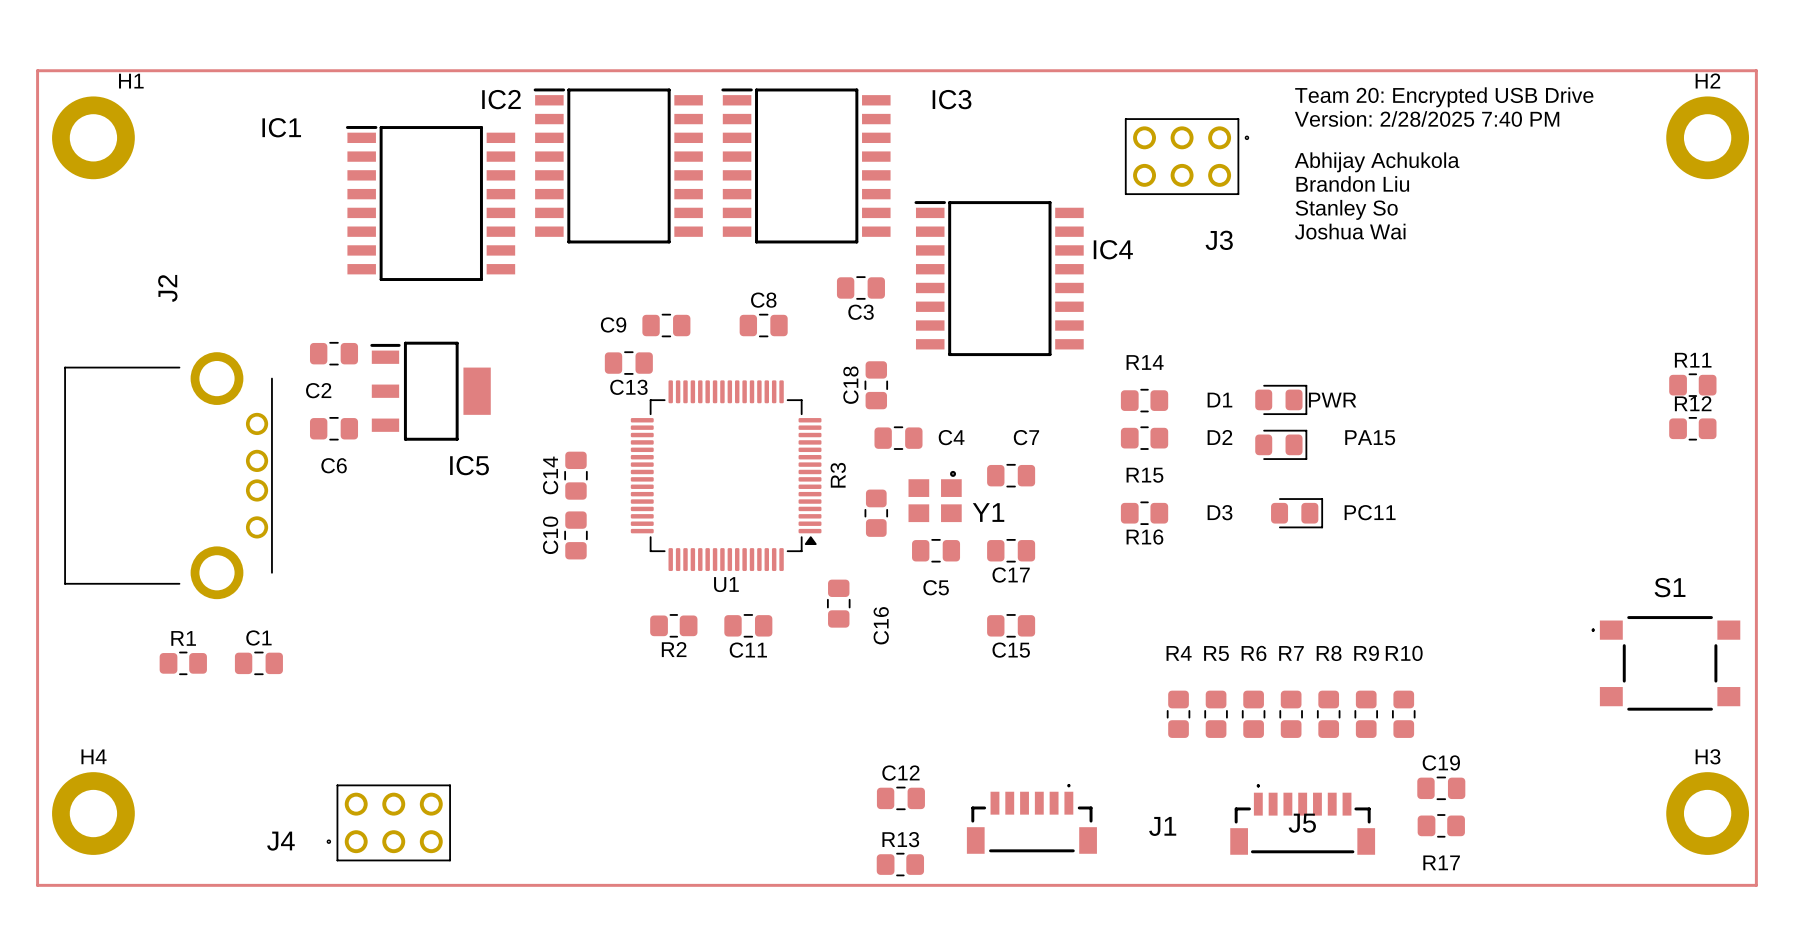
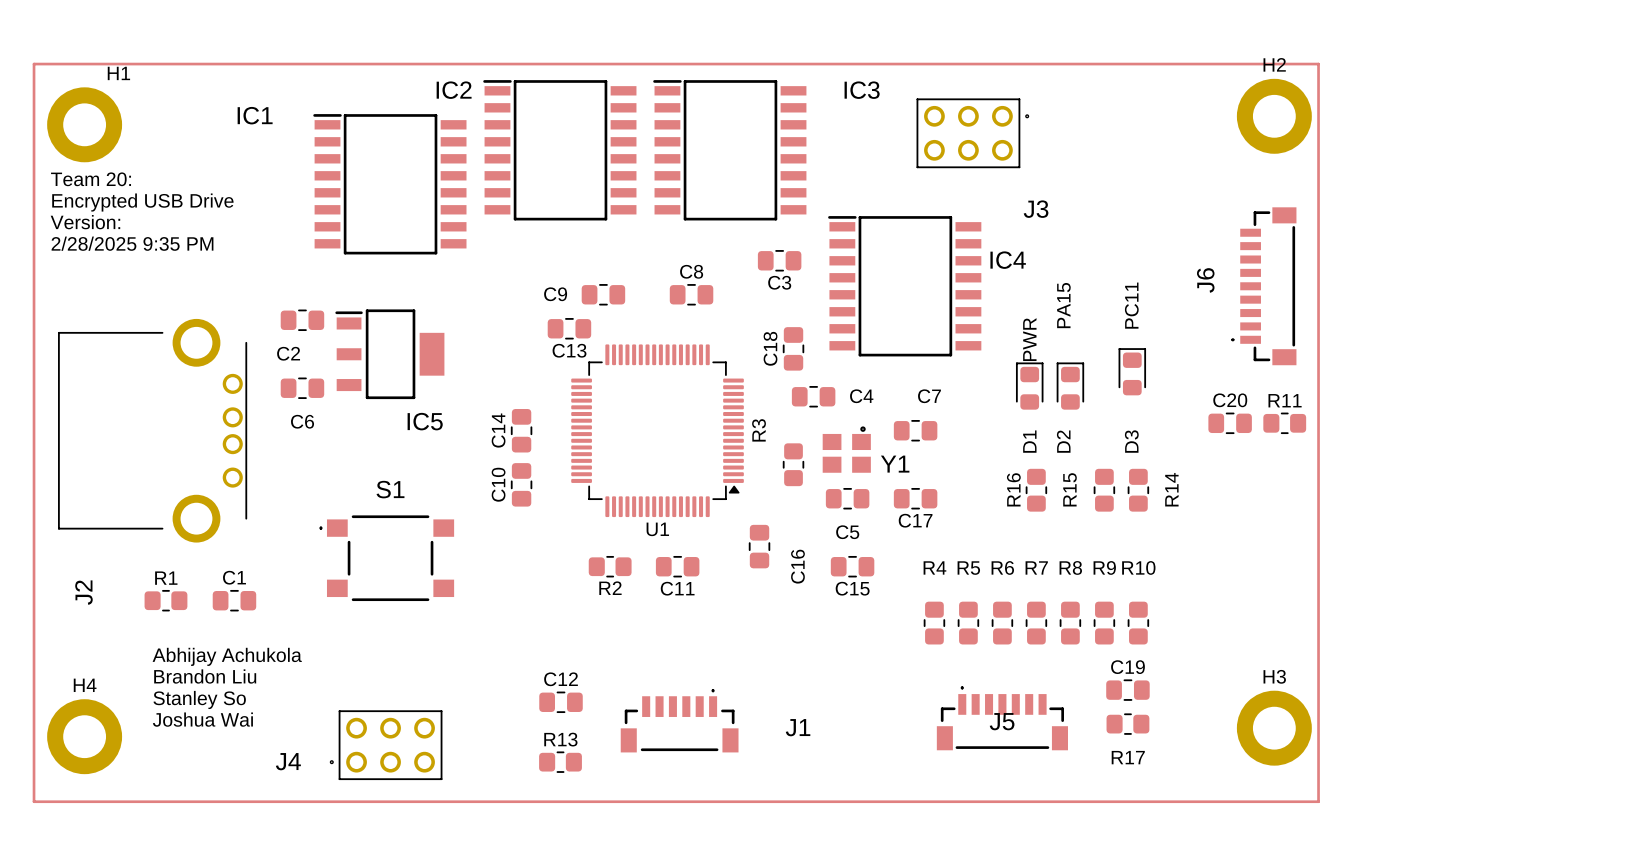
track: (1456, 70) (1756, 70) (1756, 885) (1456, 885) -> (1318, 64) (1318, 801)
text: Team 20: Encrypted USB Drive (1444, 97) -> none
text: Version: 2/28/2025 7:40 PM (1427, 118) -> none
H2 position: (1707, 137) -> (1274, 116)
J3 position: (1187, 156) -> (972, 133)
text: Abhijay Achukola (1377, 162) -> none
text: Brandon Liu (1352, 183) -> none
text: none -> Team 20: (91, 179)
text: Stanley So (1346, 209) -> none
text: none -> Encrypted USB Drive (142, 202)
text: Joshua Wai (1350, 231) -> none
J3 name position: J3 (1219, 240) -> J3 (1036, 209)
text: none -> Version: (85, 222)
text: none -> 2/28/2025 9:35 PM (132, 243)
IC4 position: (999, 278) -> (904, 286)
J2 name position: J2 (167, 288) -> J2 (83, 592)
J6: none -> (1263, 286)
R11 position: (1692, 385) -> (1284, 423)
D1 rotation: 0° (1281, 399) -> 90° counterclockwise (1029, 386)
D1 position: (1281, 399) -> (1029, 386)
R14 rotation: 0° (1144, 400) -> 90° clockwise (1138, 490)
R14 position: (1144, 400) -> (1138, 490)
text rotation: 0° (1332, 400) -> 90° counterclockwise (1029, 339)
text position: PWR (1332, 400) -> PWR (1029, 339)
R12: (1692, 428) -> none
text rotation: 0° (1370, 437) -> 90° counterclockwise (1063, 305)
text position: PA15 (1370, 437) -> PA15 (1063, 305)
R15 rotation: 0° (1144, 438) -> 90° clockwise (1104, 490)
R15 position: (1144, 438) -> (1104, 490)
D2 rotation: 0° (1281, 444) -> 90° counterclockwise (1070, 386)
D2 position: (1281, 444) -> (1070, 386)
C20: none -> (1230, 423)
text rotation: 0° (1370, 512) -> 90° counterclockwise (1131, 305)
text position: PC11 (1370, 512) -> PC11 (1131, 305)
R16 rotation: 0° (1144, 513) -> 90° clockwise (1036, 490)
D3 rotation: 0° (1297, 513) -> 90° counterclockwise (1132, 371)
D3 position: (1297, 513) -> (1132, 371)
C15 position: (1011, 625) -> (852, 566)
S1 position: (1666, 663) -> (386, 558)
R4 position: (1178, 714) -> (934, 623)
R5 position: (1216, 714) -> (968, 623)
R6 position: (1253, 714) -> (1002, 623)
R7 position: (1291, 714) -> (1036, 623)
R8 position: (1328, 714) -> (1070, 623)
R9 position: (1366, 714) -> (1104, 623)
R10 position: (1403, 714) -> (1138, 623)
text: none -> Abhijay Achukola (227, 656)
text: none -> Brandon Liu (205, 676)
text: none -> Stanley So (199, 699)
C19 position: (1441, 788) -> (1127, 690)
text: none -> Joshua Wai (202, 719)
C12 position: (900, 798) -> (561, 702)
H3 position: (1707, 813) -> (1274, 728)
J1 position: (1031, 818) -> (679, 720)
J5 position: (1302, 819) -> (1002, 718)
J4 position: (388, 822) -> (386, 745)
R17 position: (1441, 825) -> (1127, 724)
R13 position: (900, 864) -> (560, 762)

